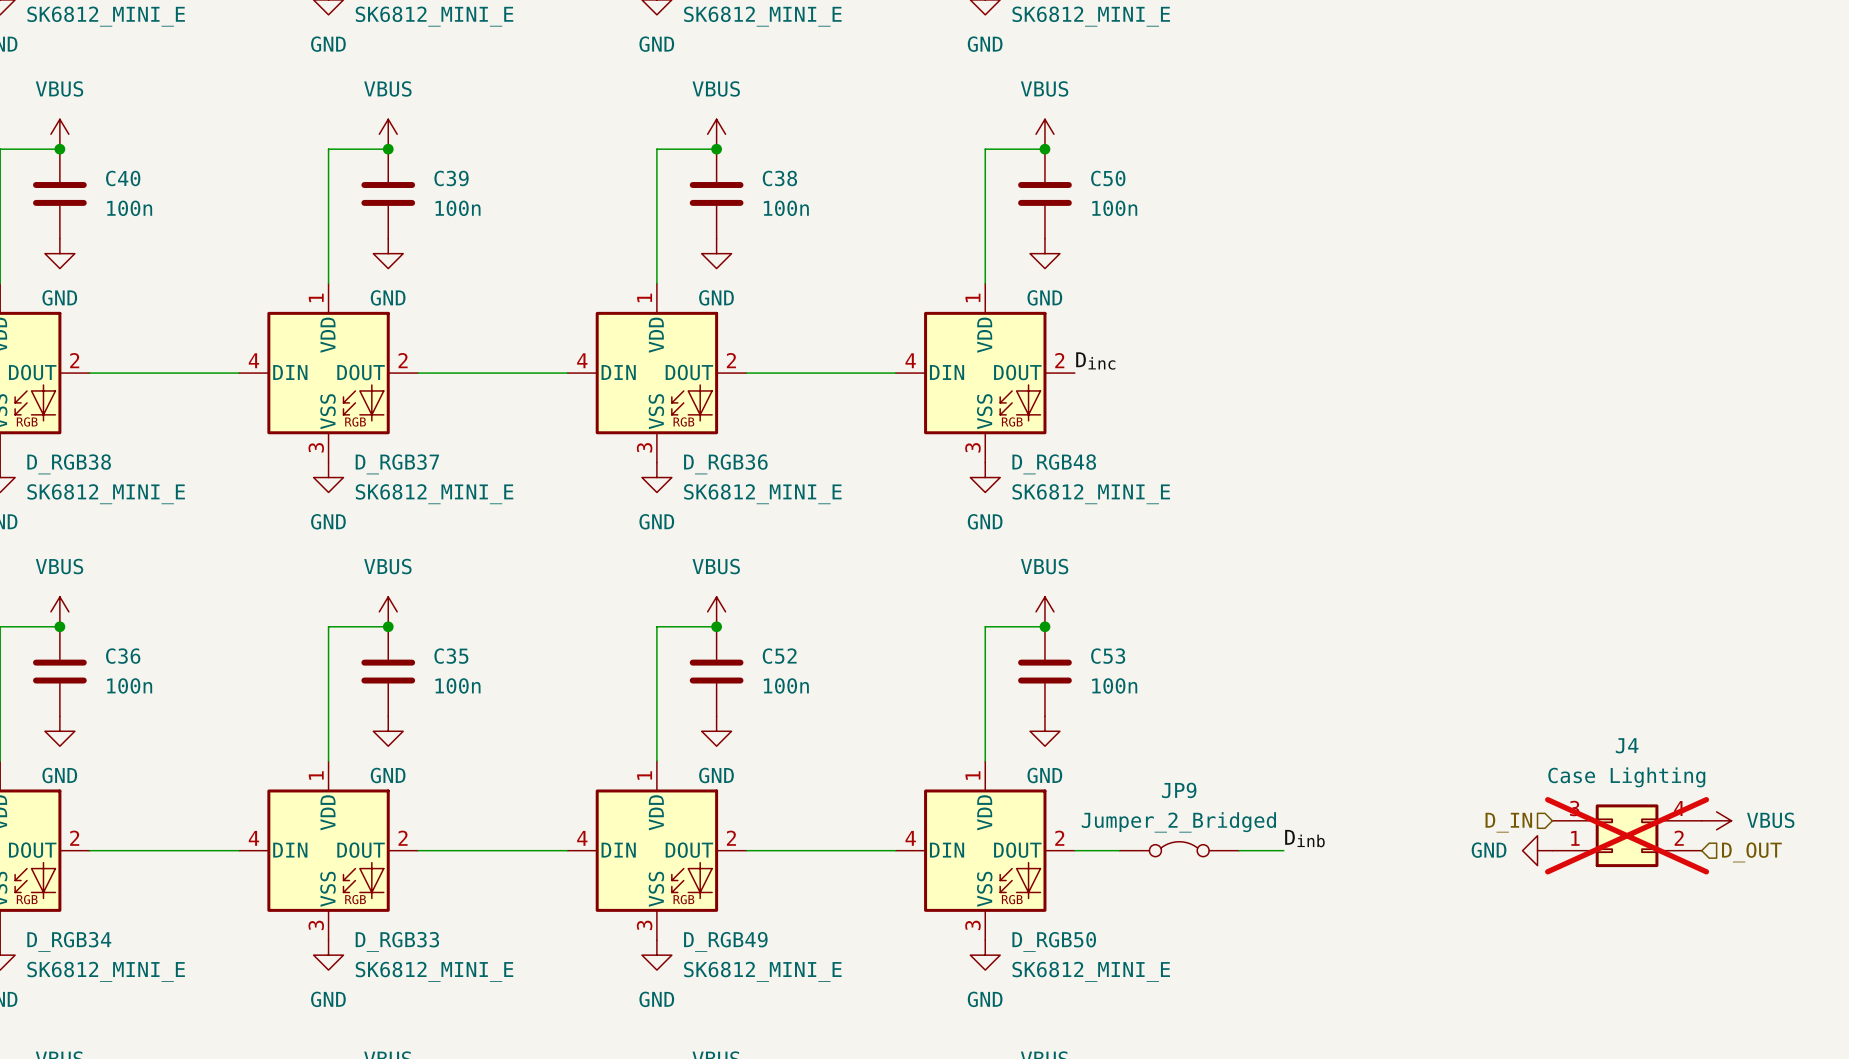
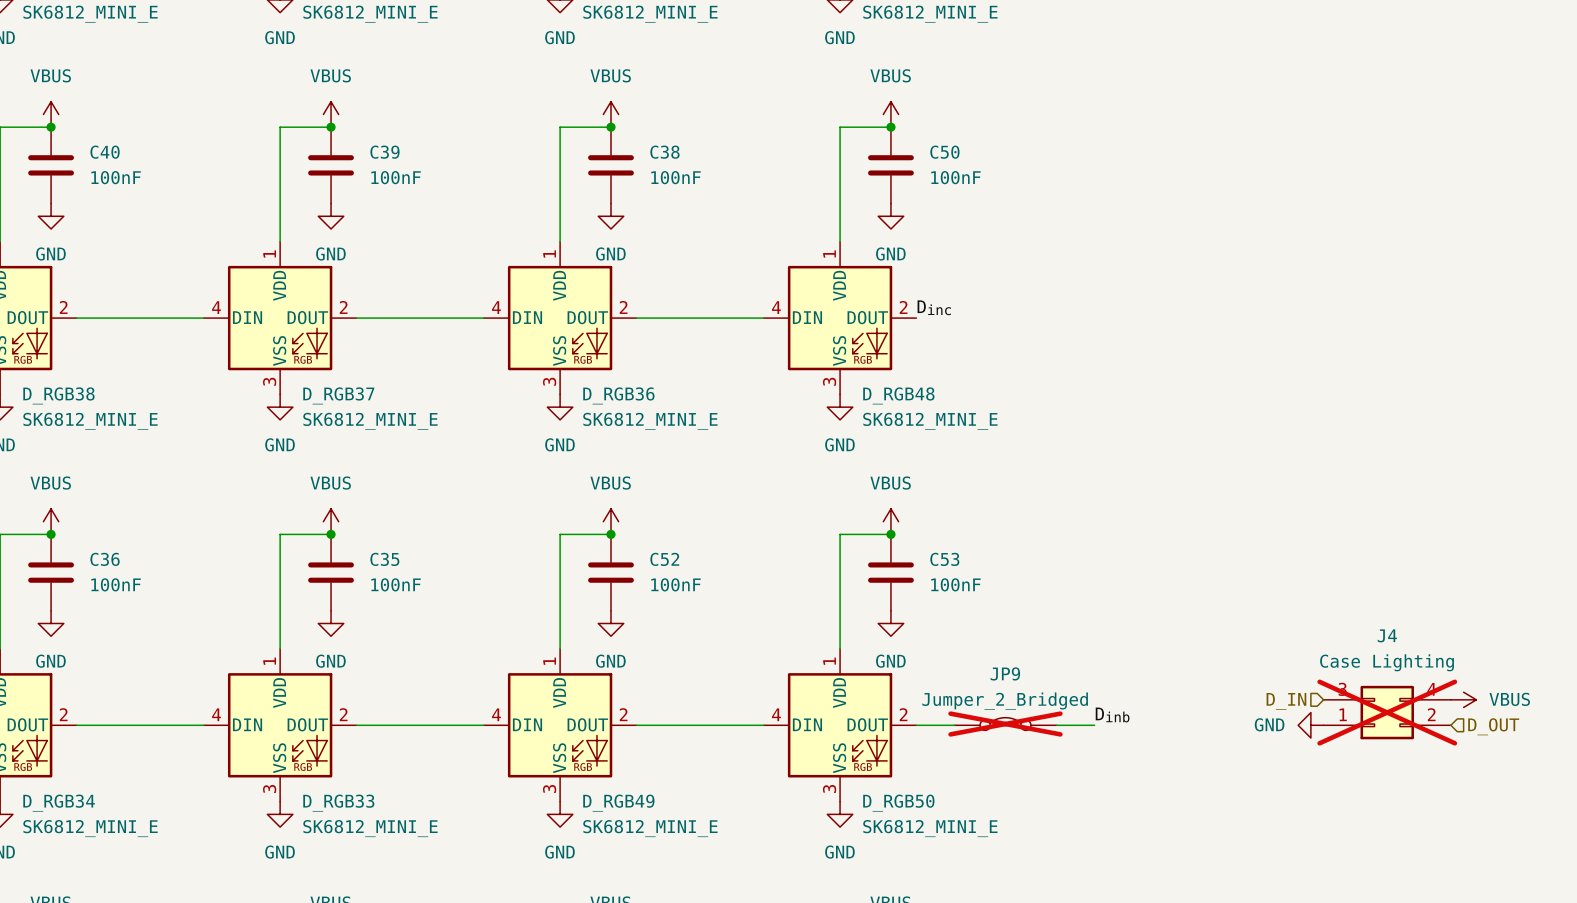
C40 value: 100n (129, 208) -> 100nF (116, 177)
C39 value: 100n (457, 208) -> 100nF (396, 177)
C38 value: 100n (786, 208) -> 100nF (675, 177)
C50 value: 100n (1114, 208) -> 100nF (955, 177)
C36 value: 100n (129, 685) -> 100nF (116, 584)
C35 value: 100n (457, 685) -> 100nF (396, 584)
C52 value: 100n (786, 685) -> 100nF (675, 584)
C53 value: 100n (1114, 685) -> 100nF (955, 584)
JP9 do-not-place cross: none -> (1005, 724)

